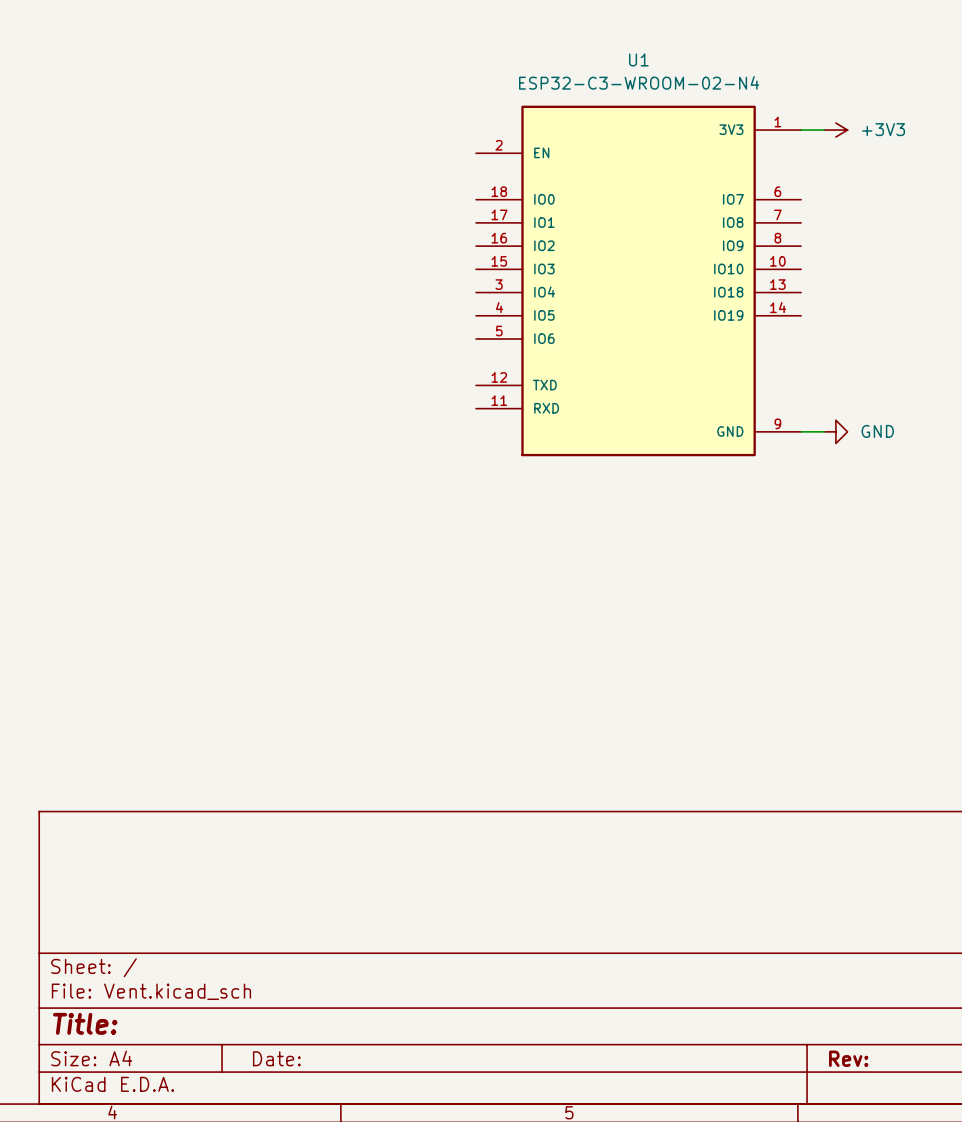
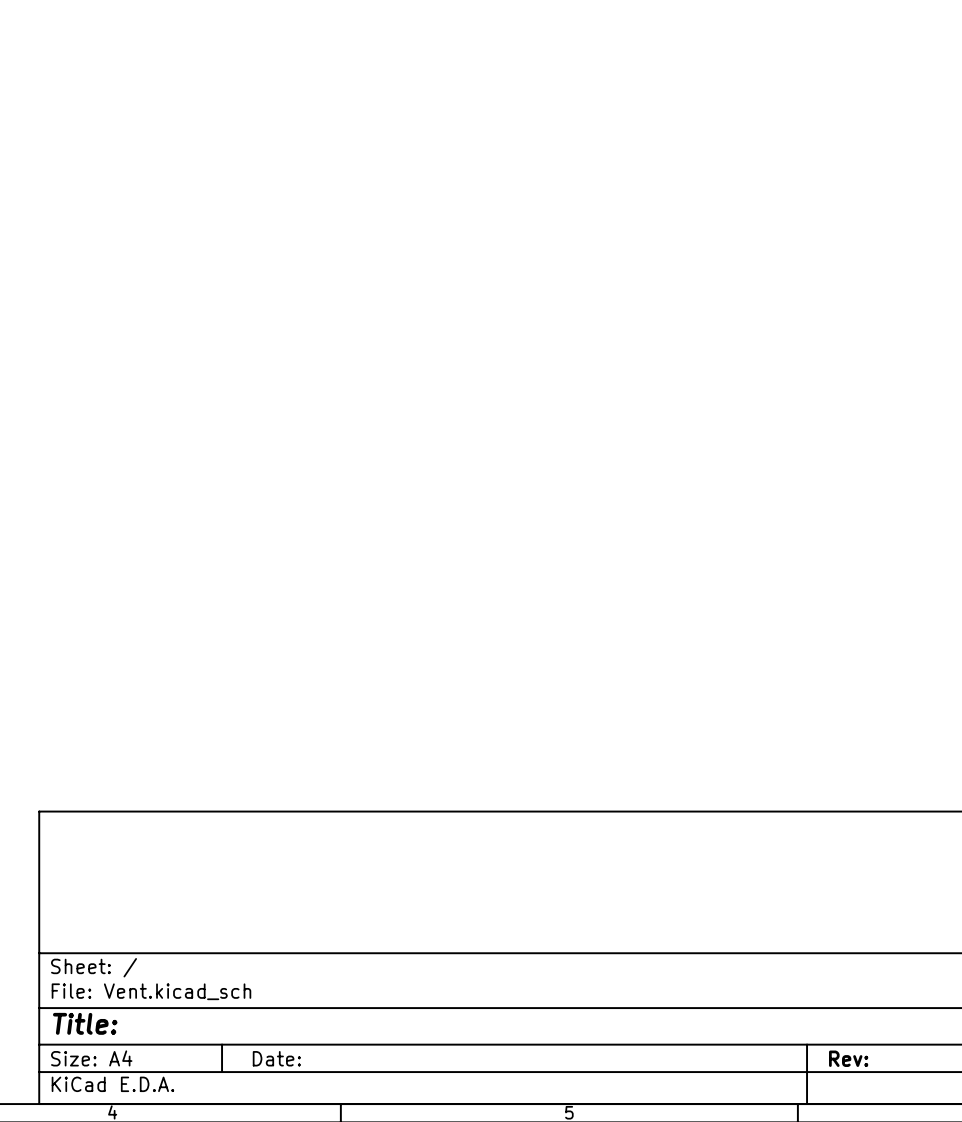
wire: (801, 130) (824, 130) -> none
power symbol: +3V3 (835, 130) -> none
U1: ESP32-C3-WROOM-02-N4 (638, 280) -> none
wire: (801, 431) (824, 431) -> none
power symbol: GND (835, 431) -> none

